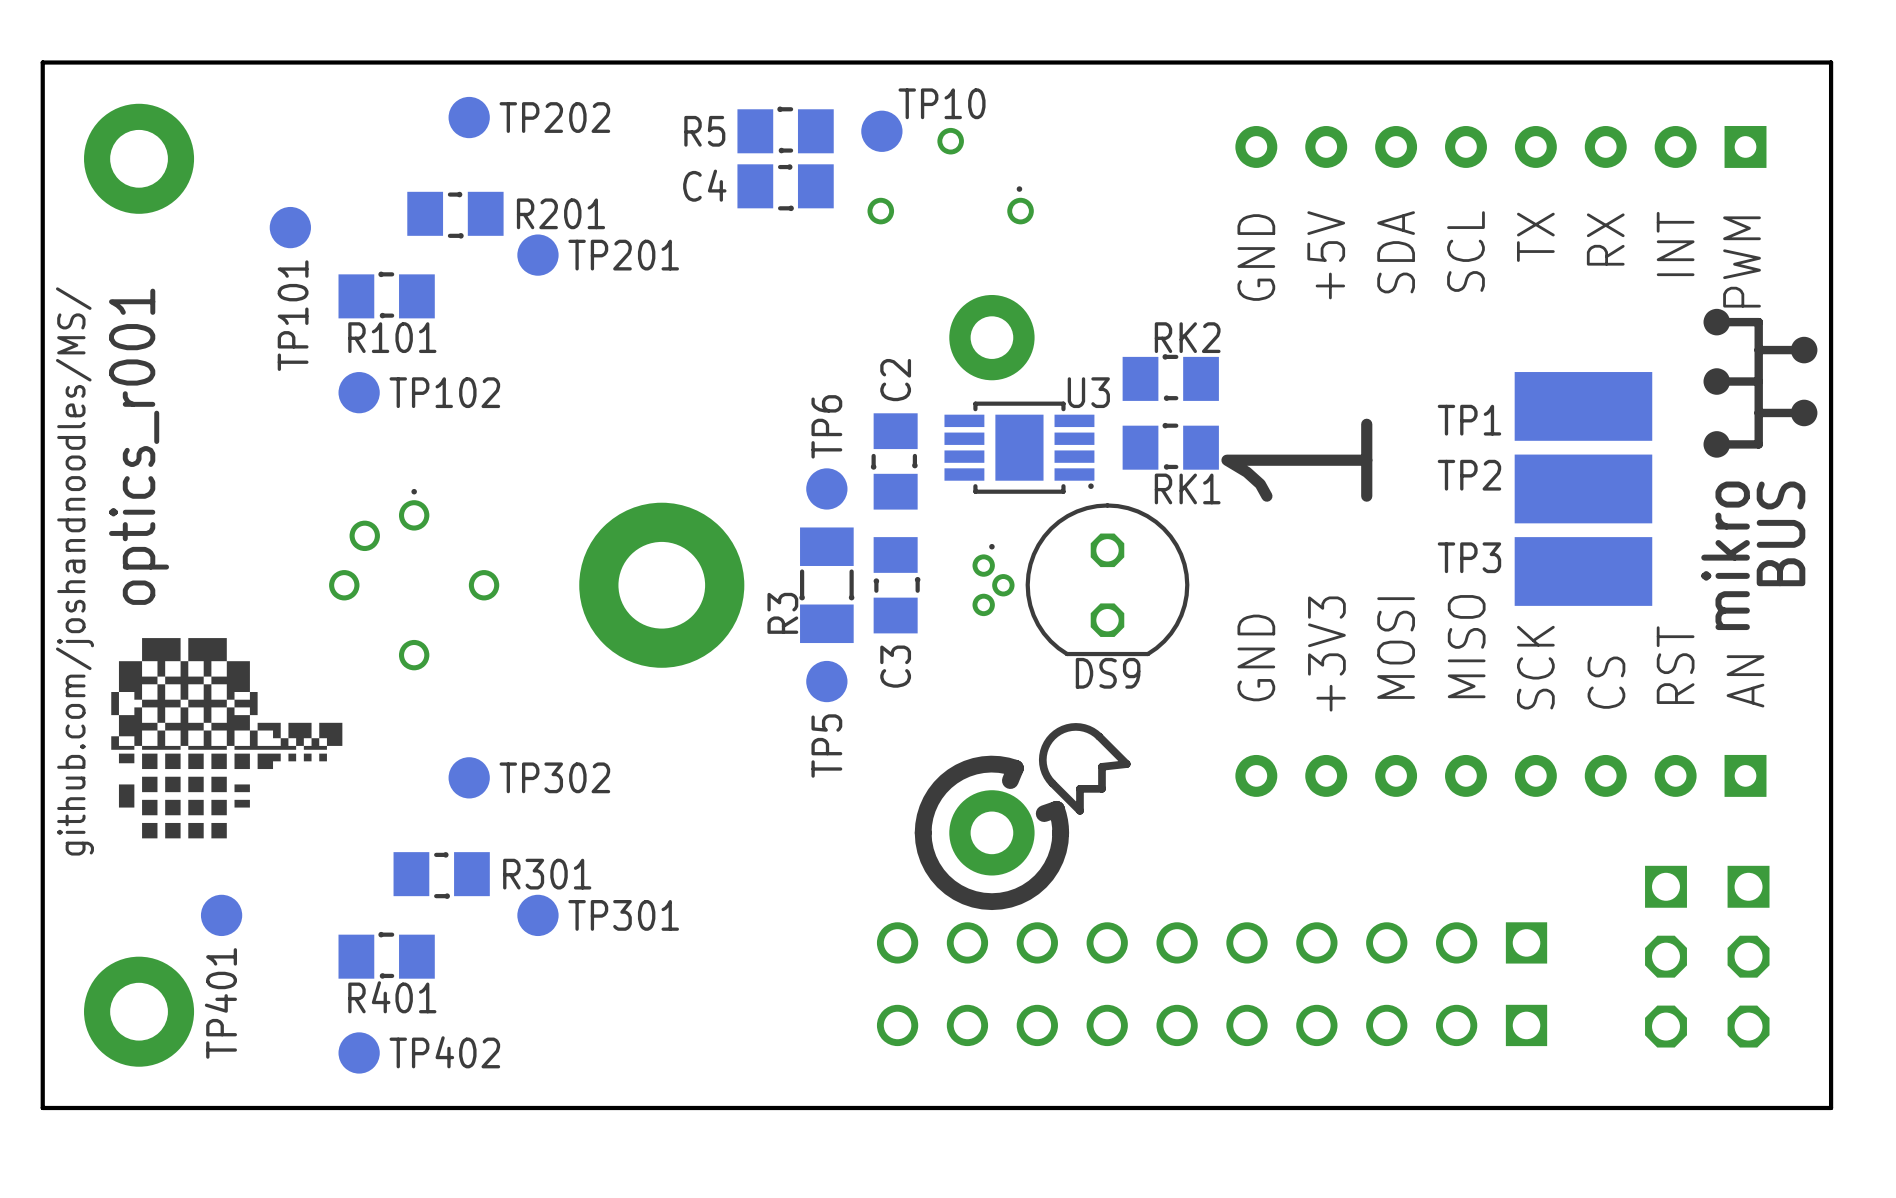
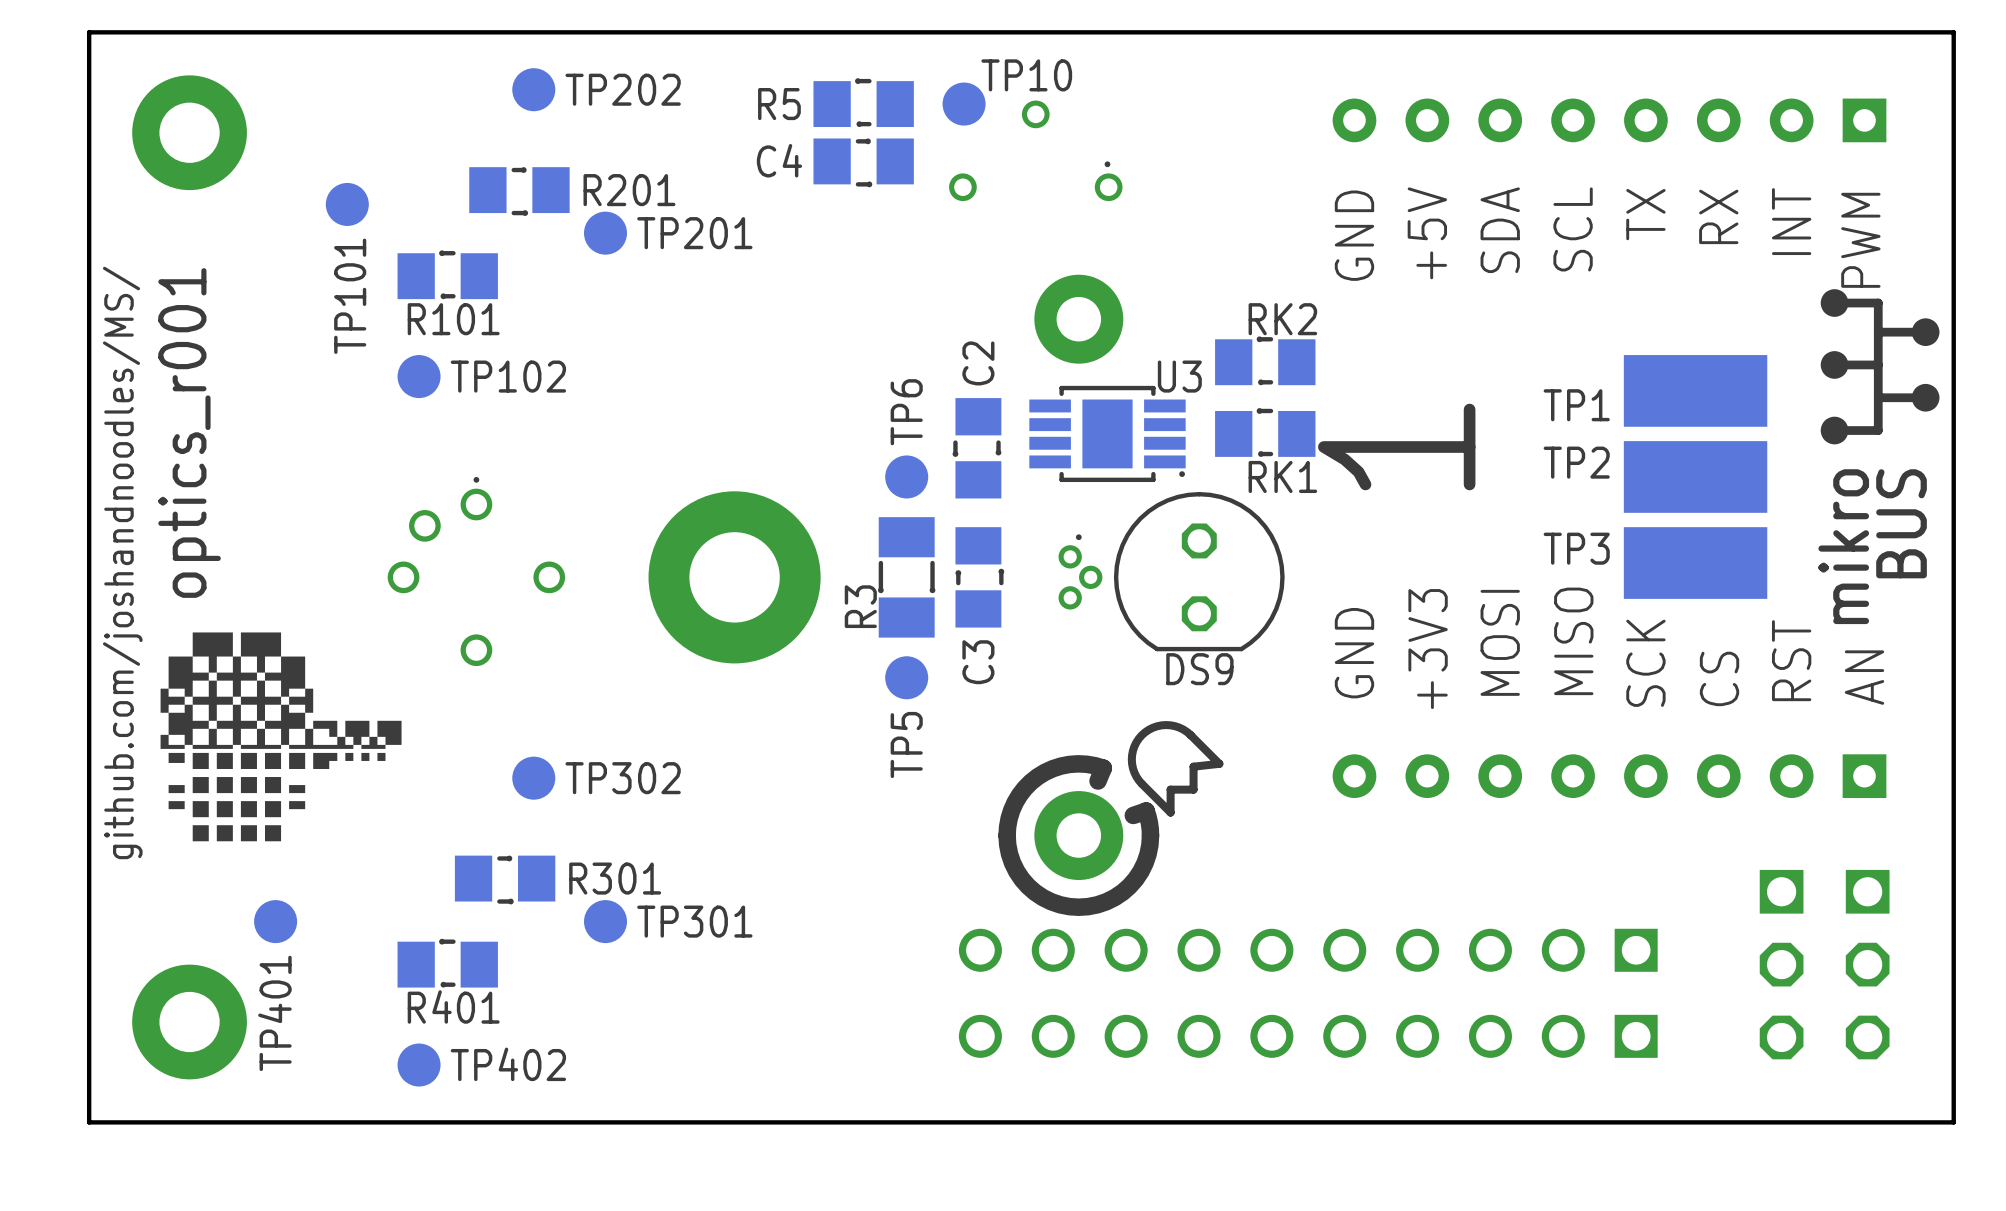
drawing: none -> [168, 696, 185, 705]
drawing: [118, 784, 135, 808] -> none
drawing: none -> [168, 785, 185, 810]

